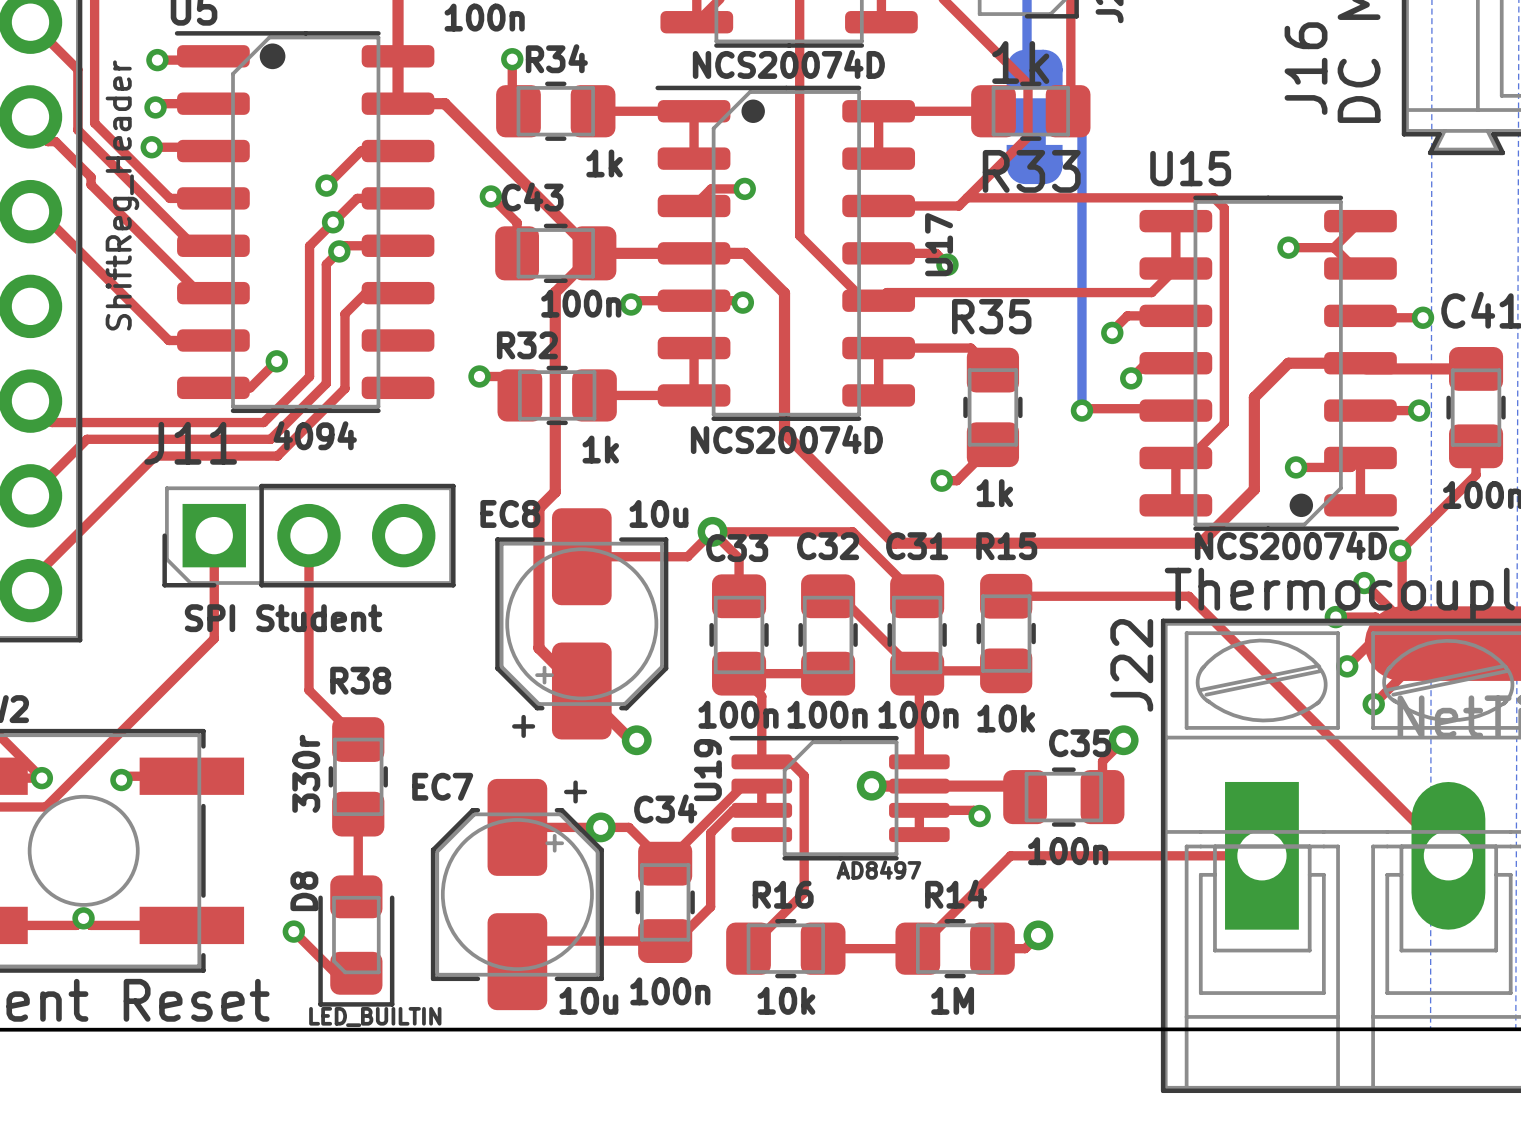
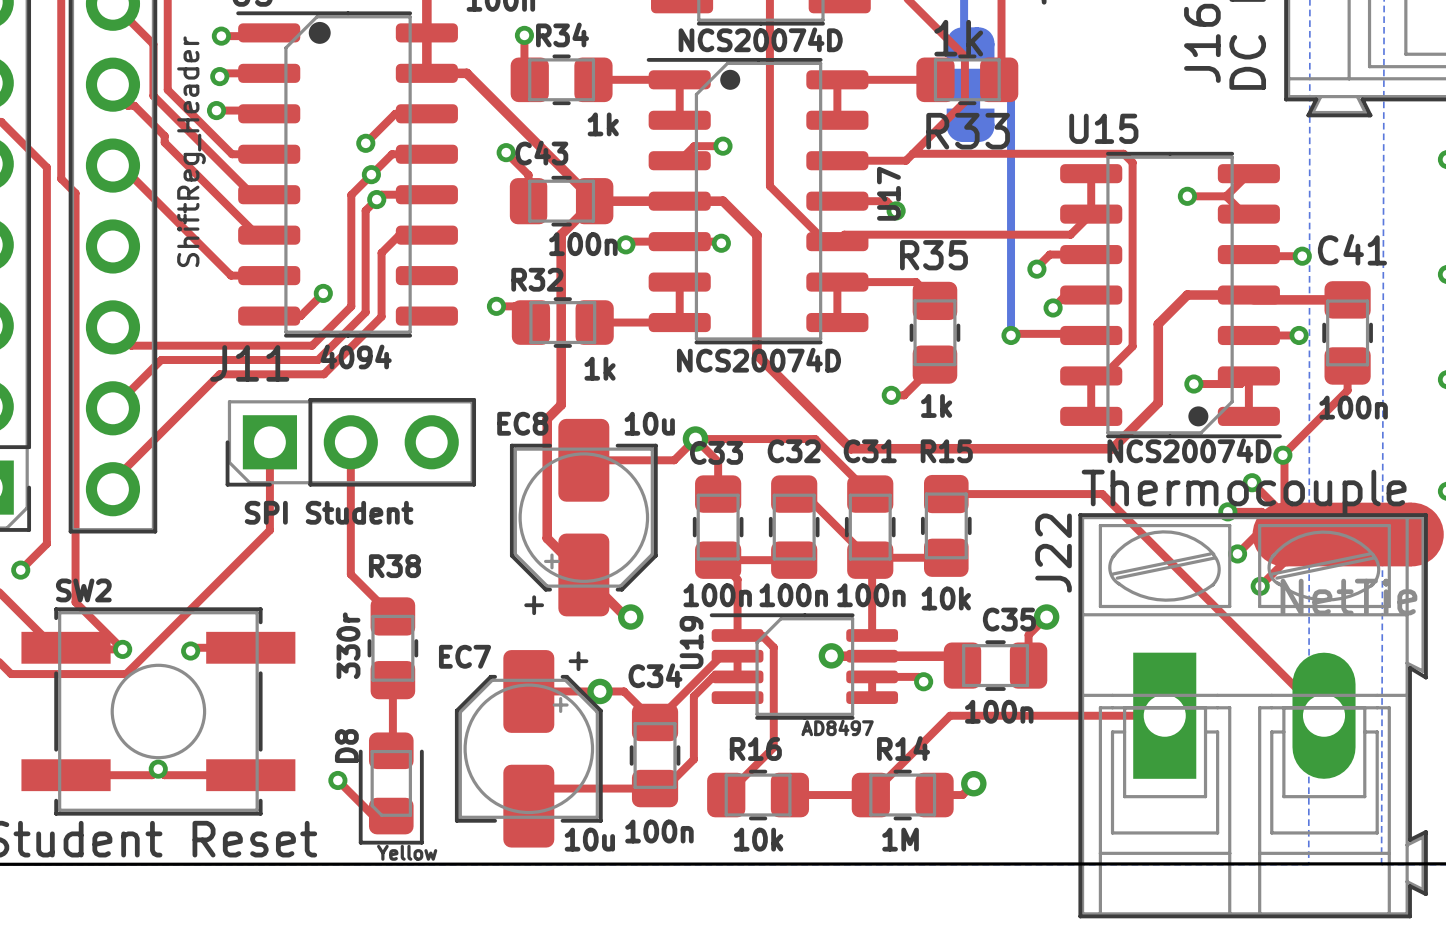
D8 value: LED_BUILTIN (375, 1017) -> Yellow (407, 852)

